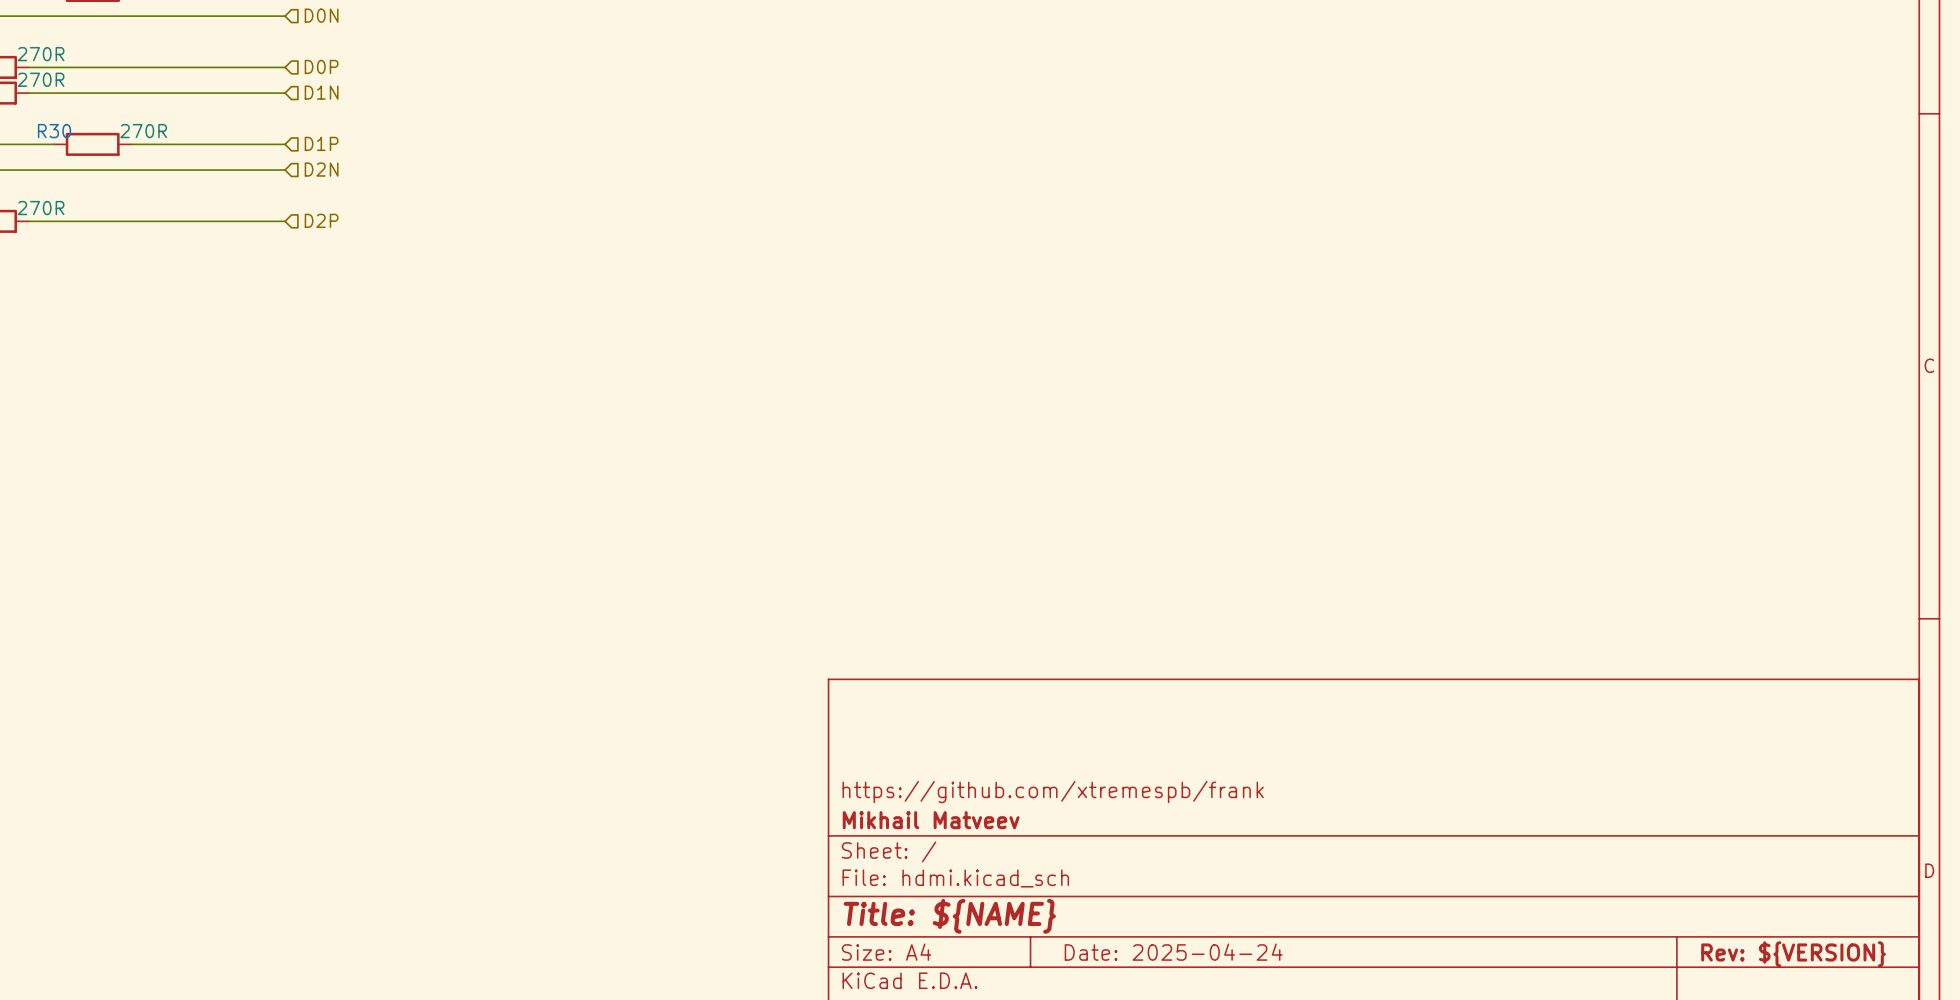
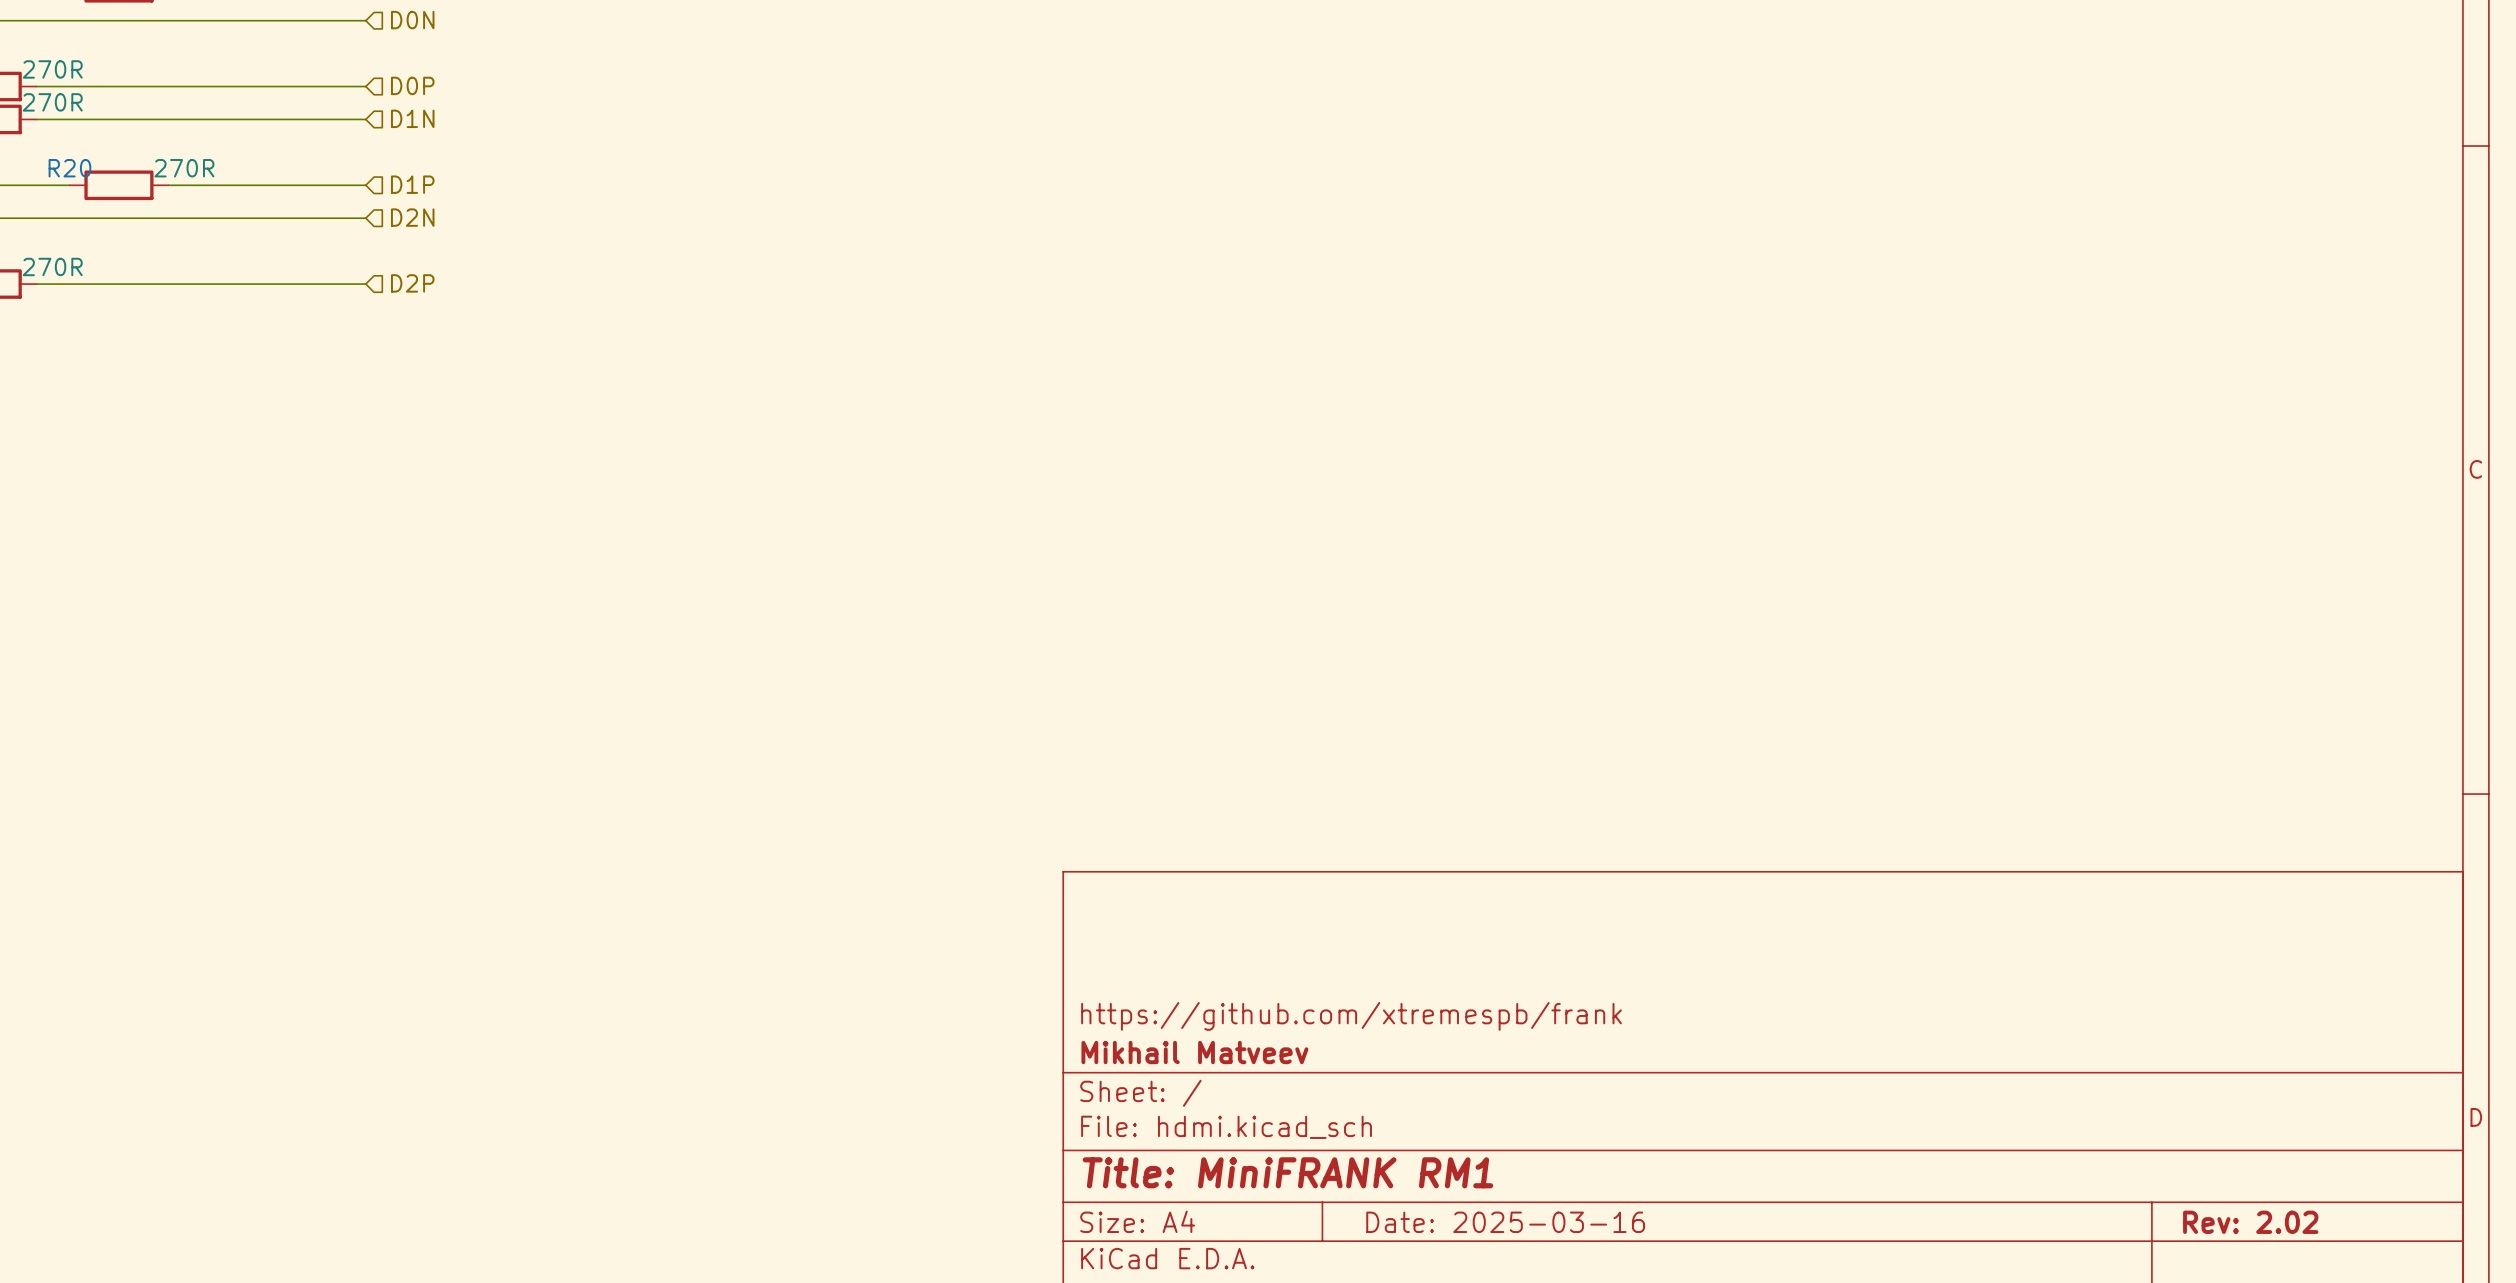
R30 name: R30 (54, 131) -> R20 (69, 168)
title block: Title: ${NAME} (949, 916) -> Title: MiniFRANK RM1 (1287, 1172)
title block: Date: 2025-04-24 (1173, 952) -> Date: 2025-03-16 (1505, 1222)
title block: Rev: ${VERSION} (1793, 954) -> Rev: 2.02 (2250, 1222)

